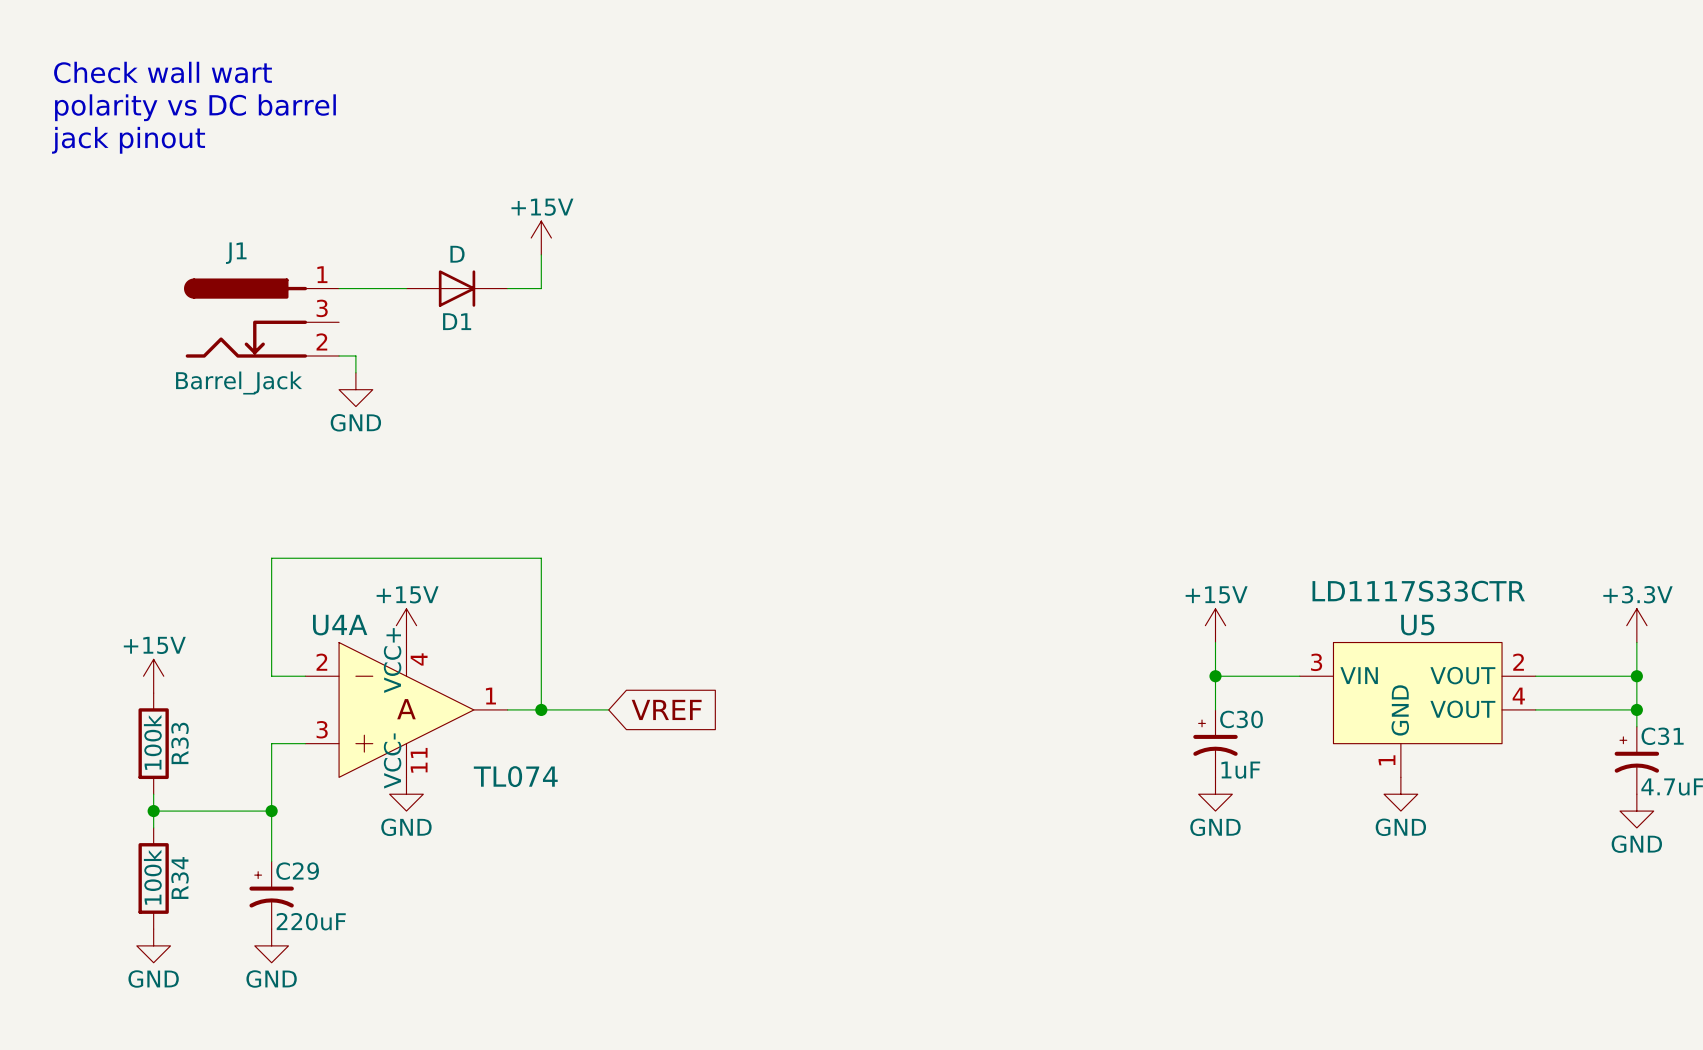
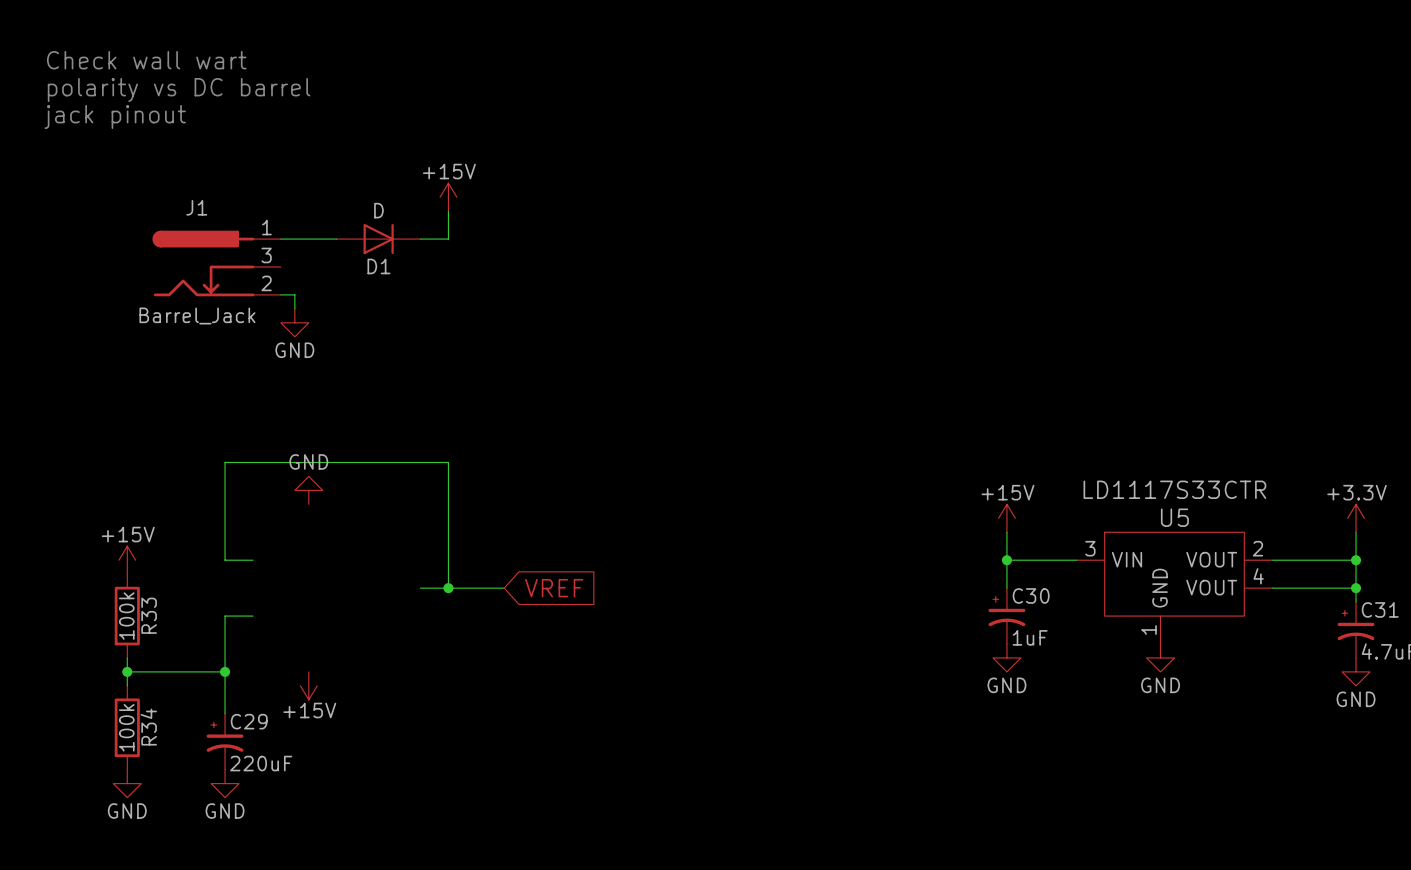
power symbol rotation: 0° (406, 625) -> 180° (308, 685)
power symbol position: +15V (406, 625) -> +15V (308, 685)
U4A: TL074 (406, 709) -> none
power symbol rotation: 0° (406, 794) -> 180° (308, 490)
power symbol position: GND (406, 794) -> GND (308, 490)

